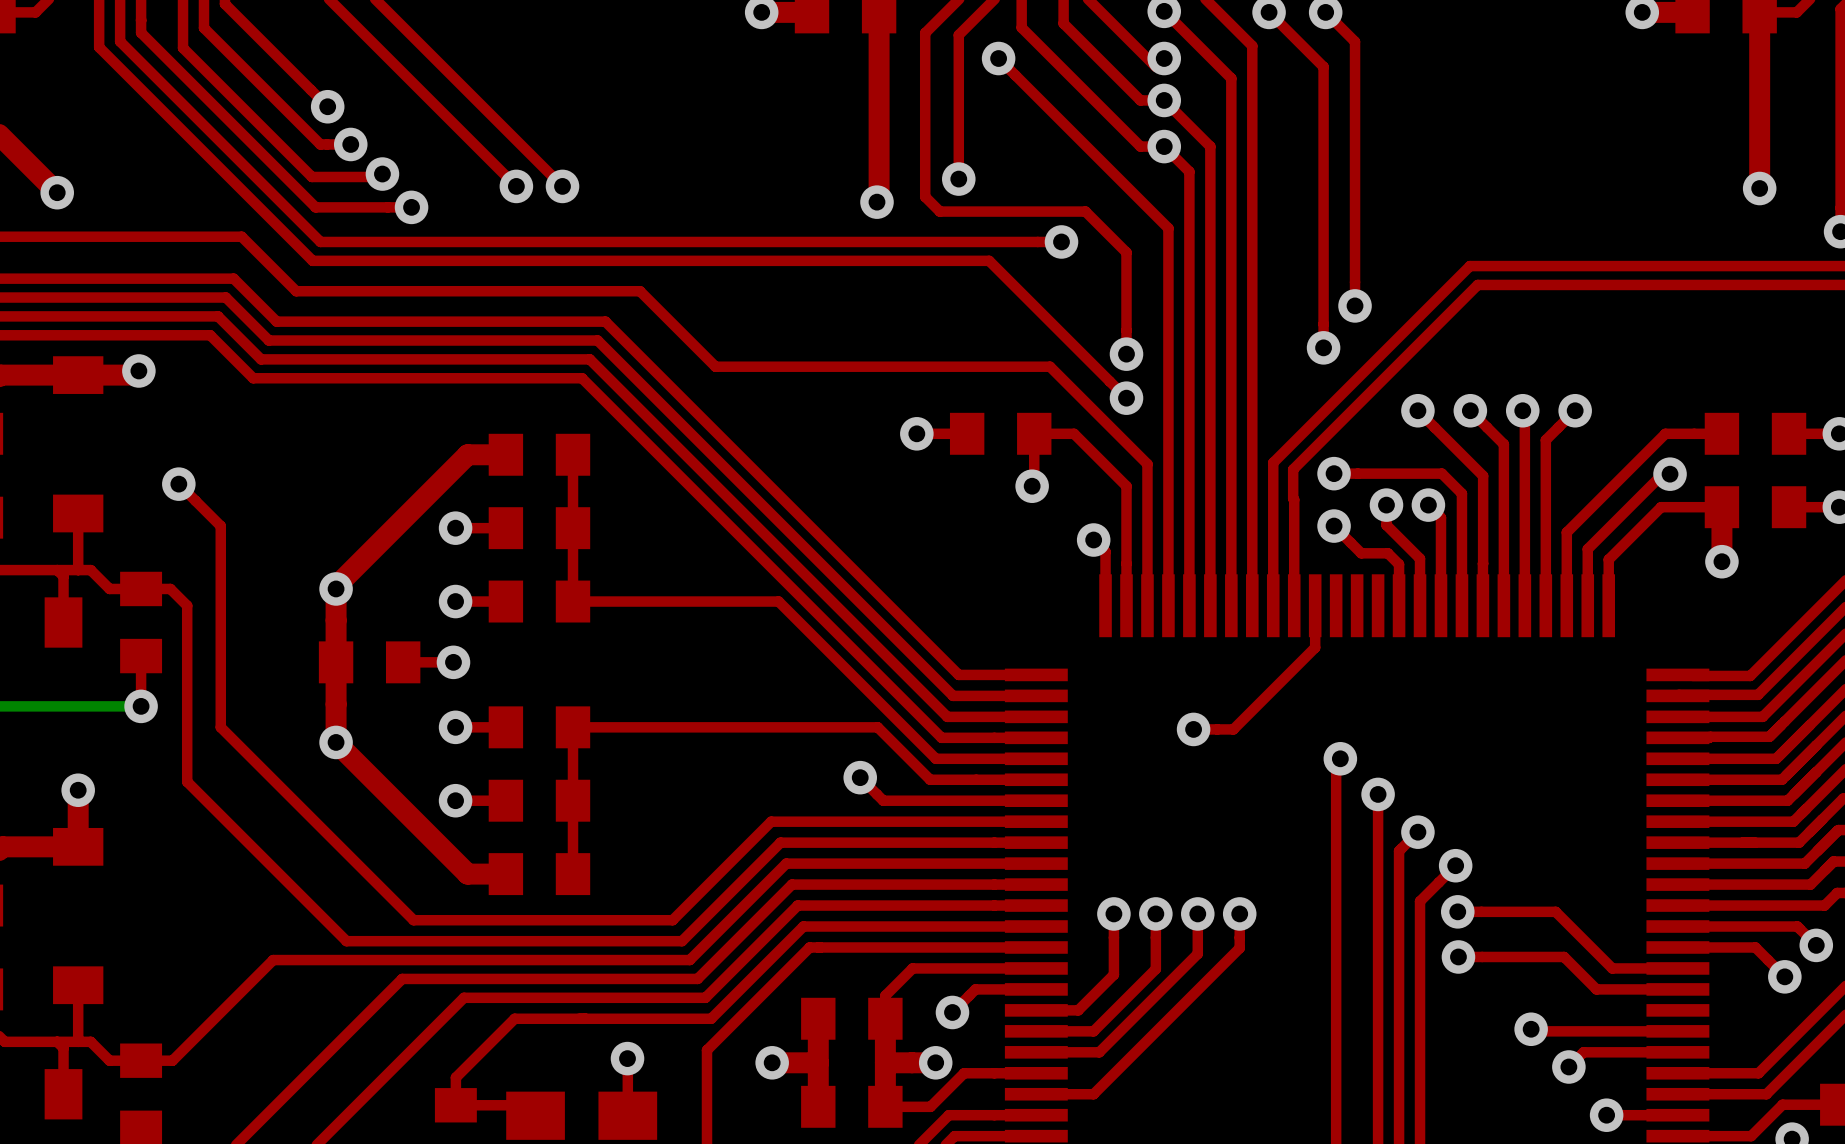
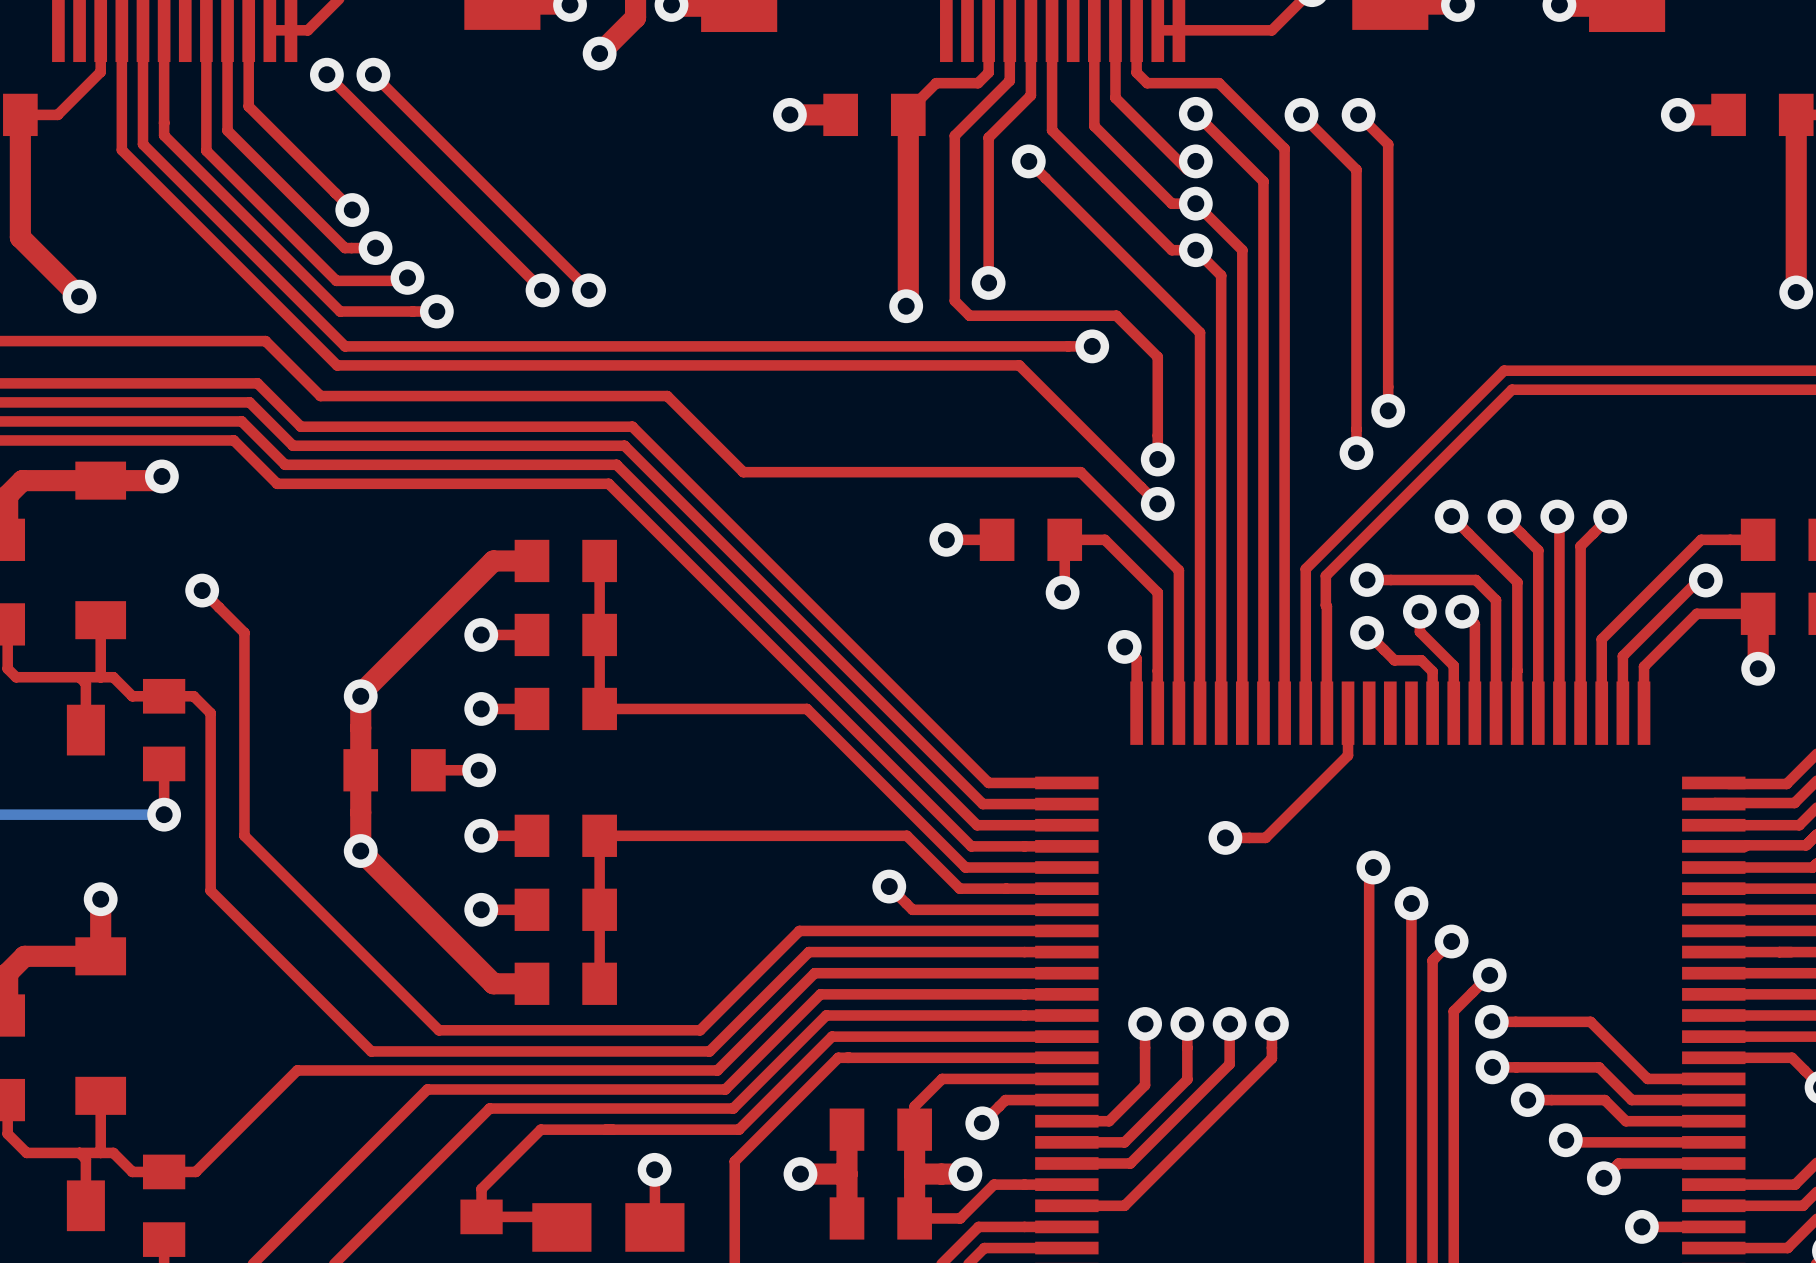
top track: none -> (1527, 1100) (1604, 1100) (1625, 1121) (1713, 1121)
via: none -> (1527, 1100)

